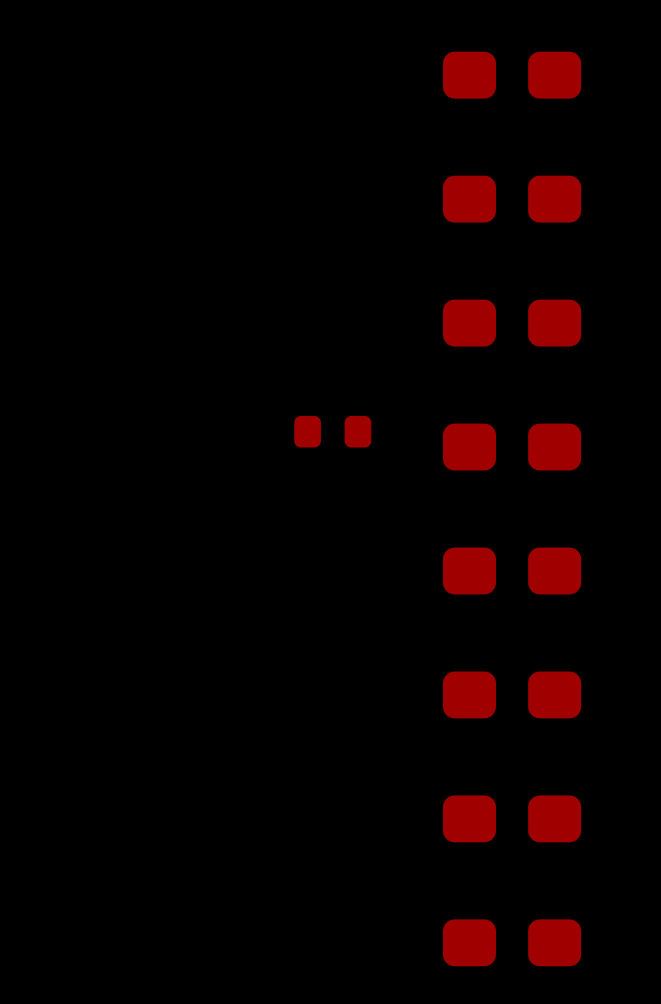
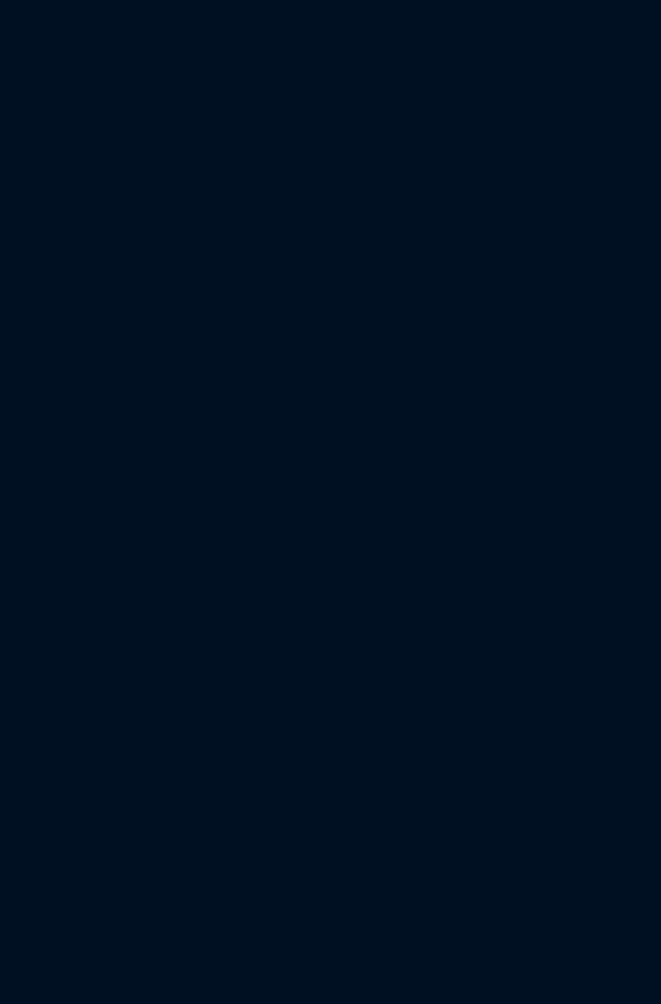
part: (512, 75) -> none
part: (512, 199) -> none
part: (512, 323) -> none
part: (332, 431) -> none
part: (512, 447) -> none
part: (512, 570) -> none
part: (512, 694) -> none
part: (512, 818) -> none
part: (512, 942) -> none

